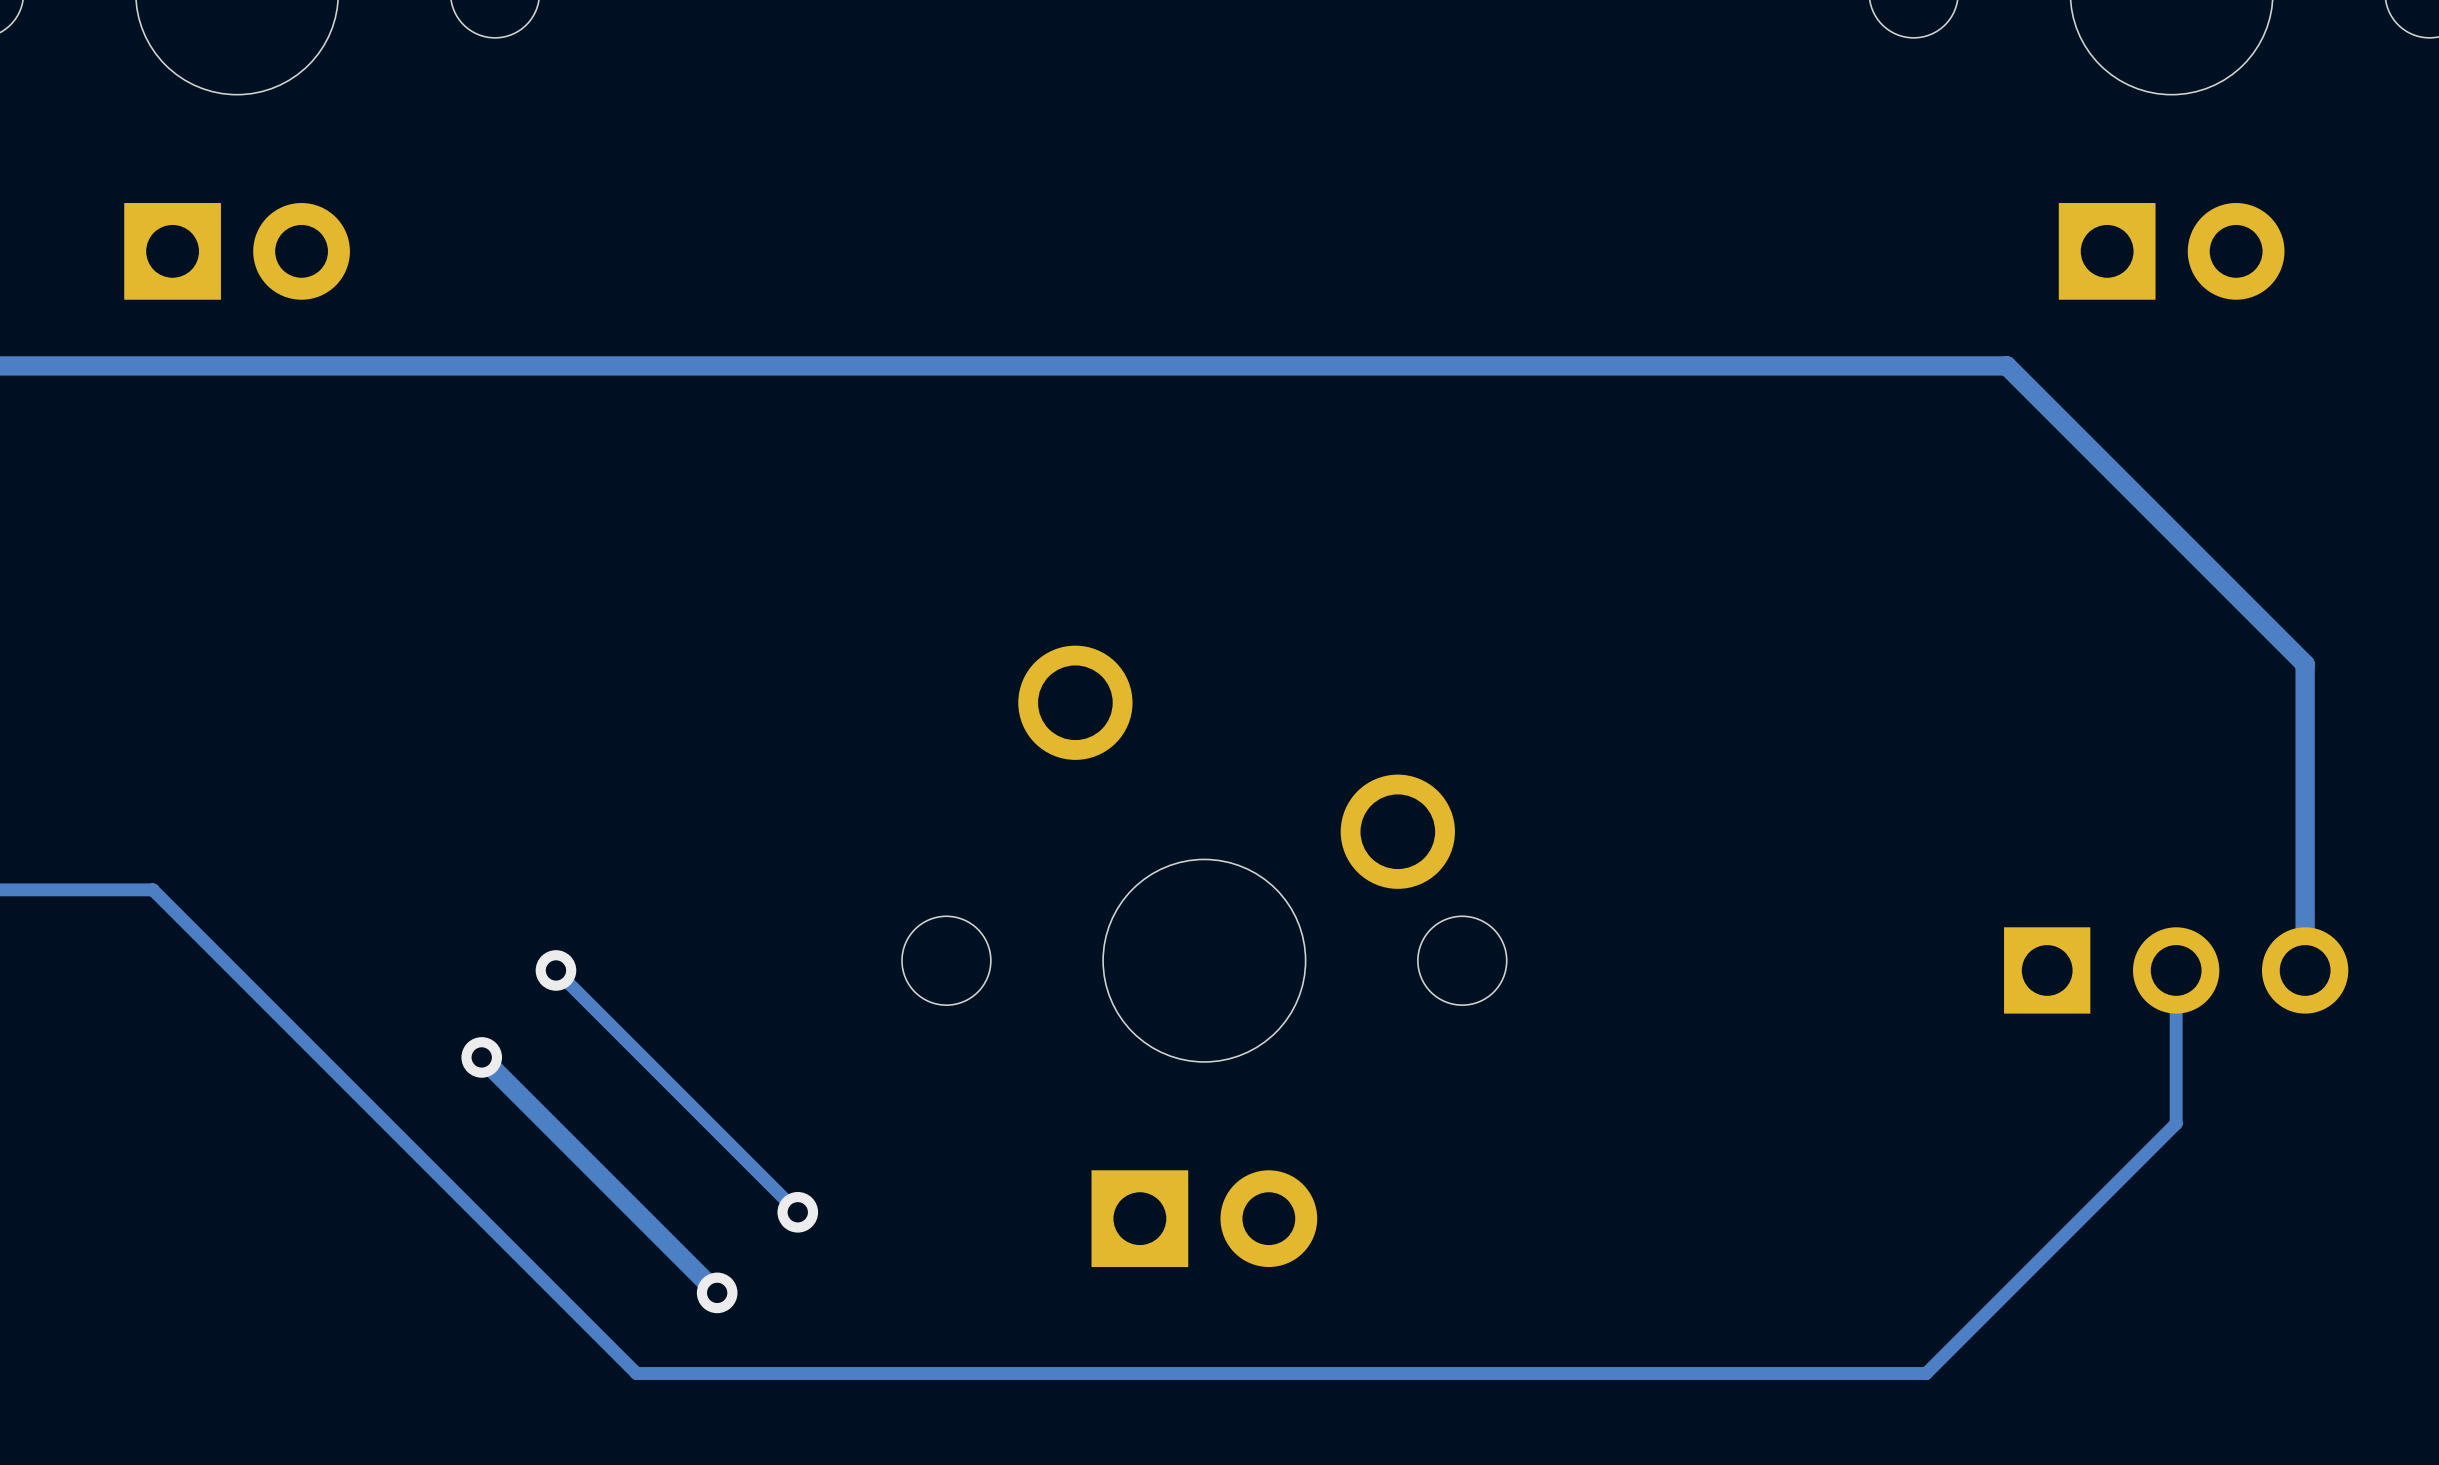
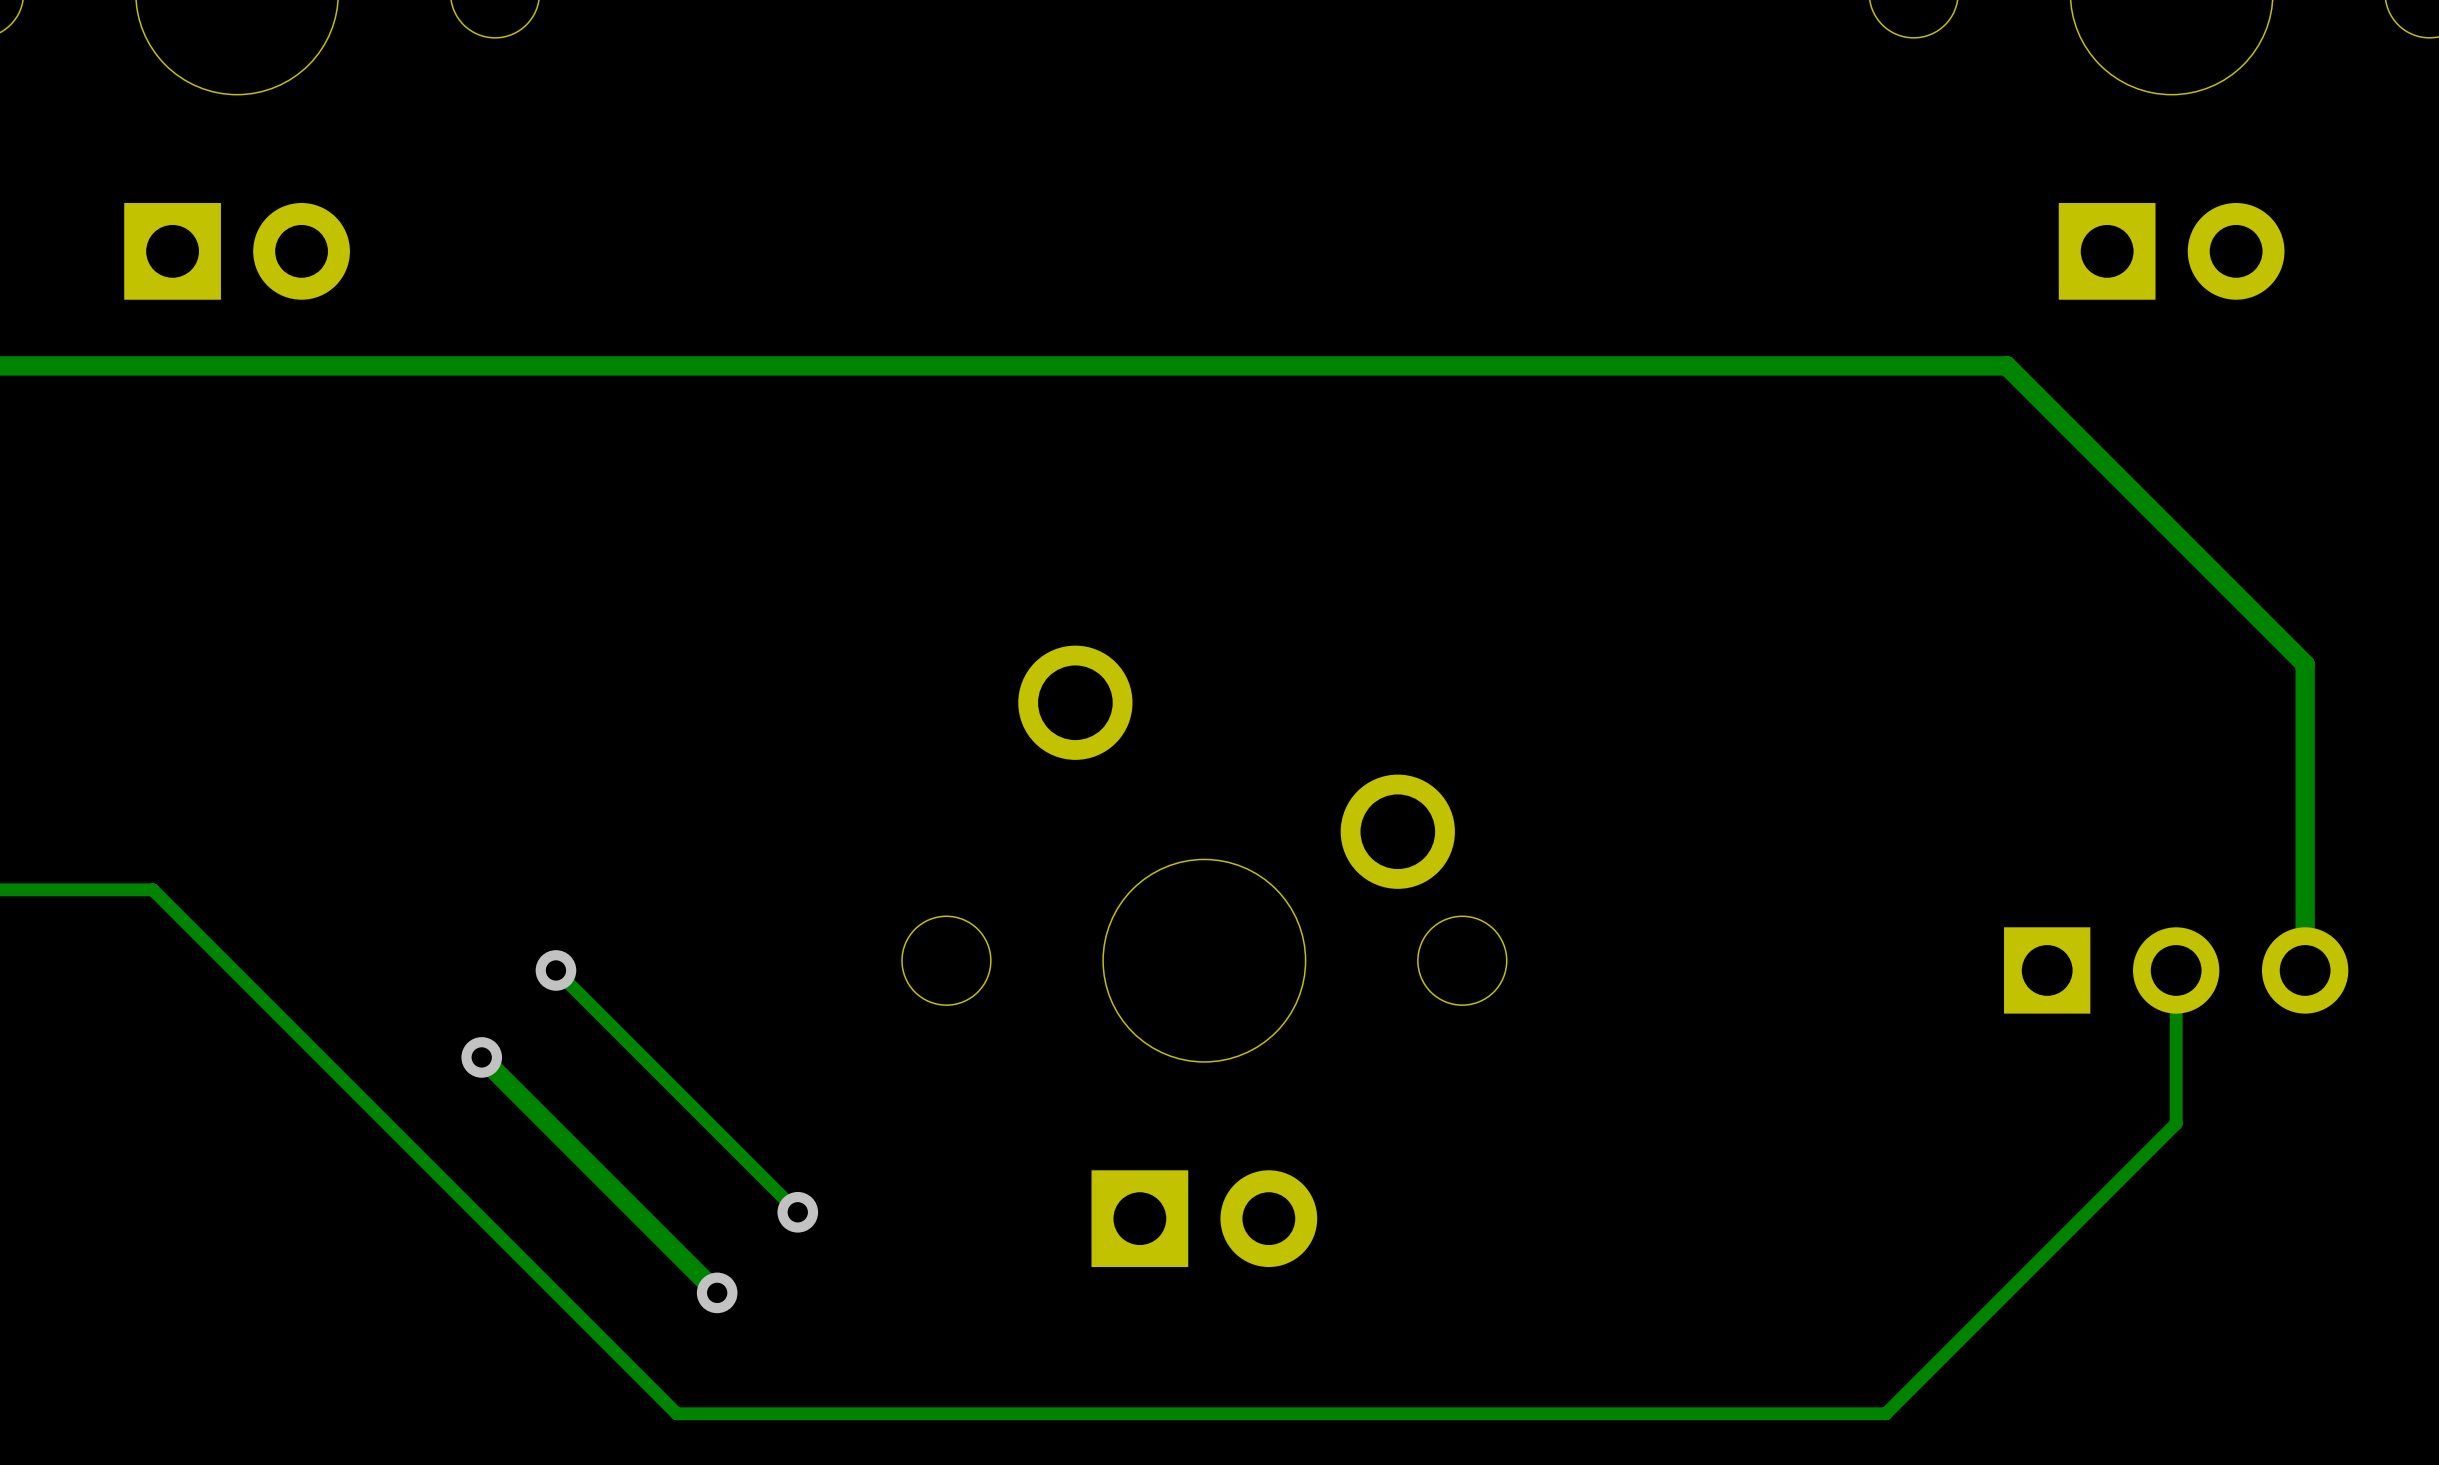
track: (1926, 1373) (636, 1373) -> (1926, 1373) (1885, 1413) (676, 1413) (636, 1373)

